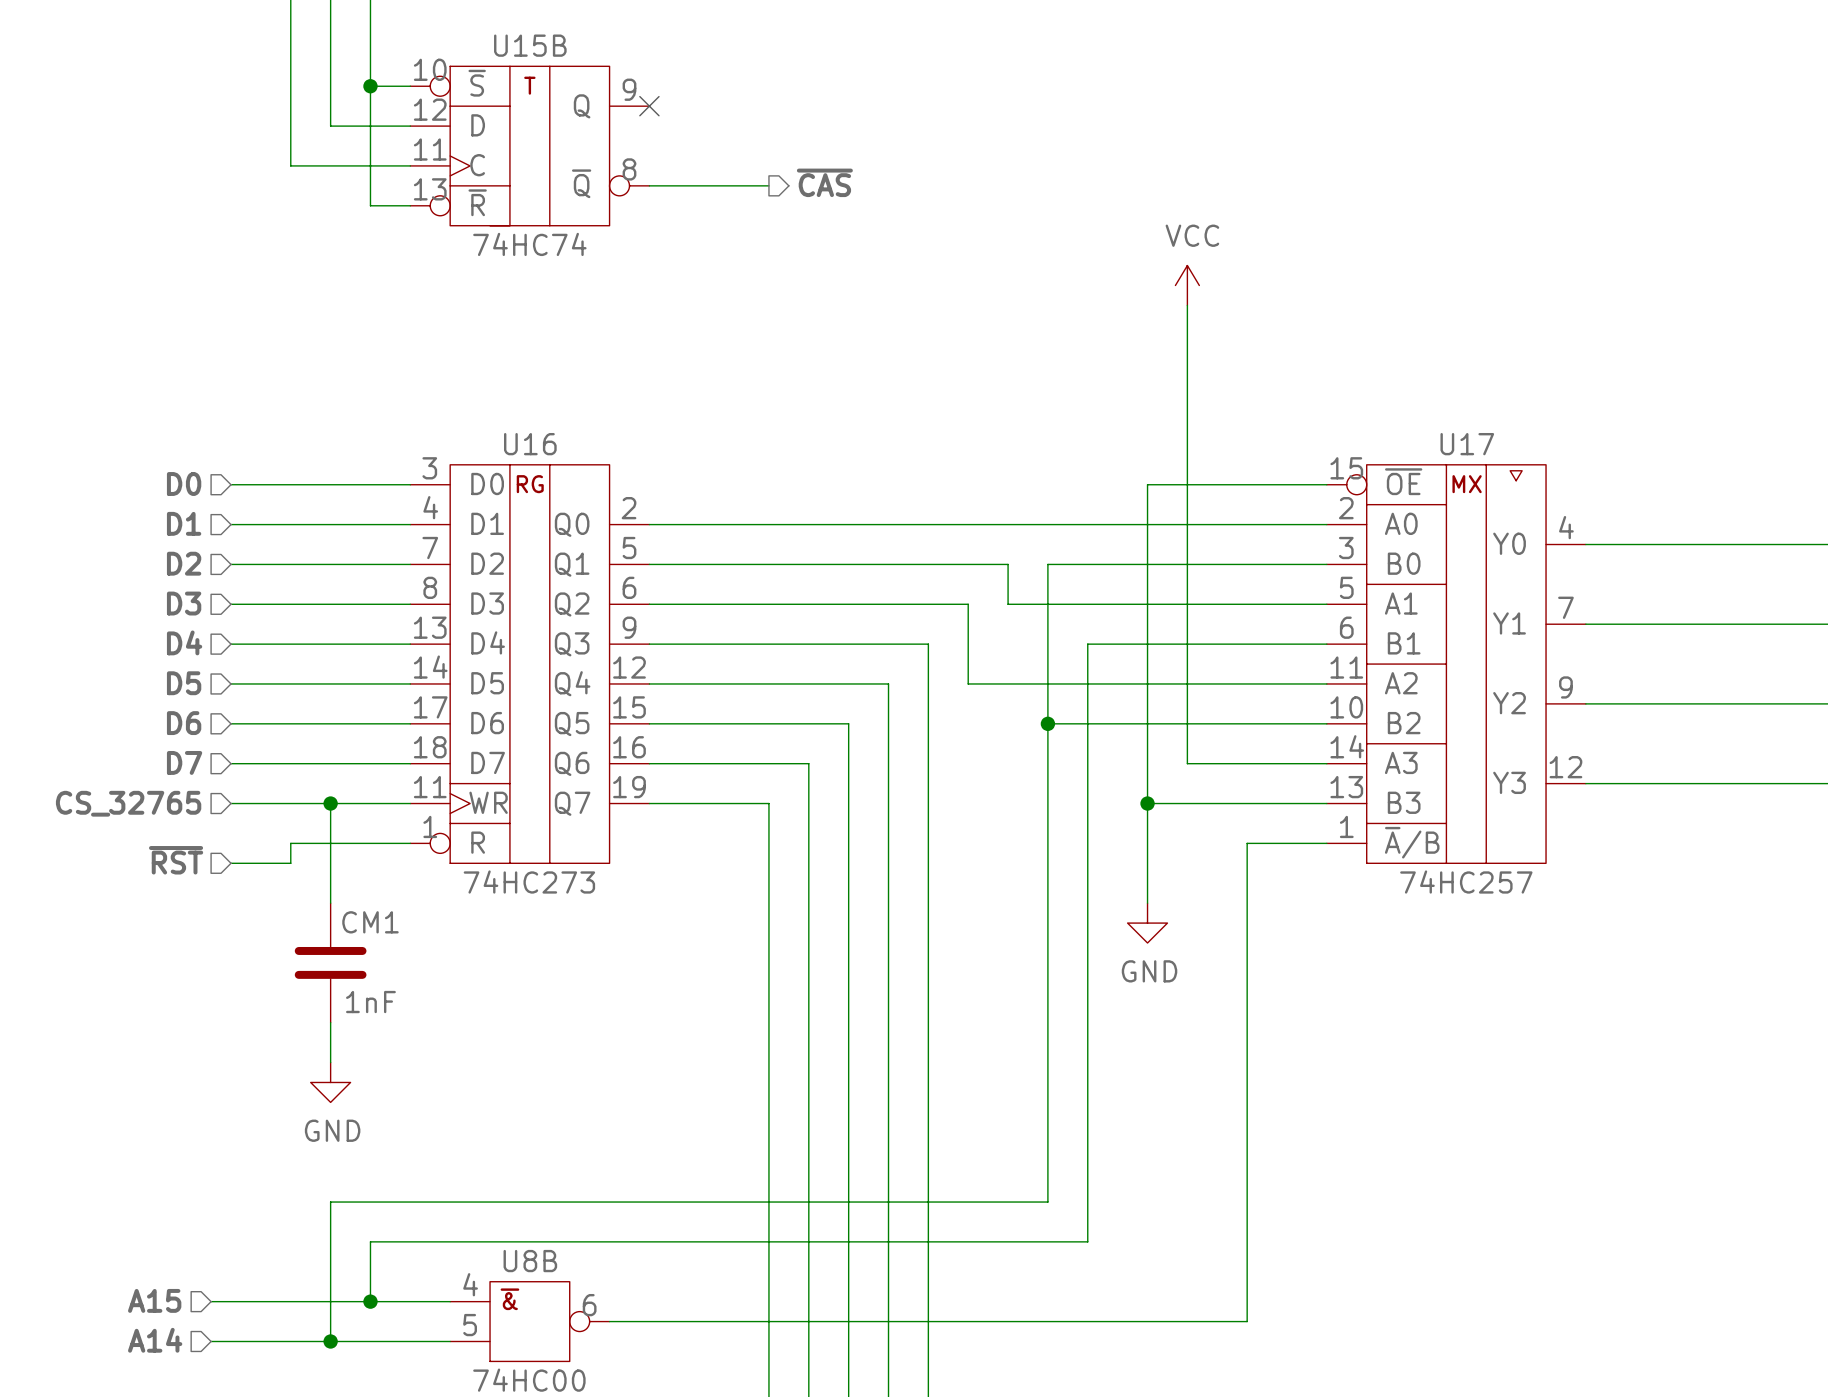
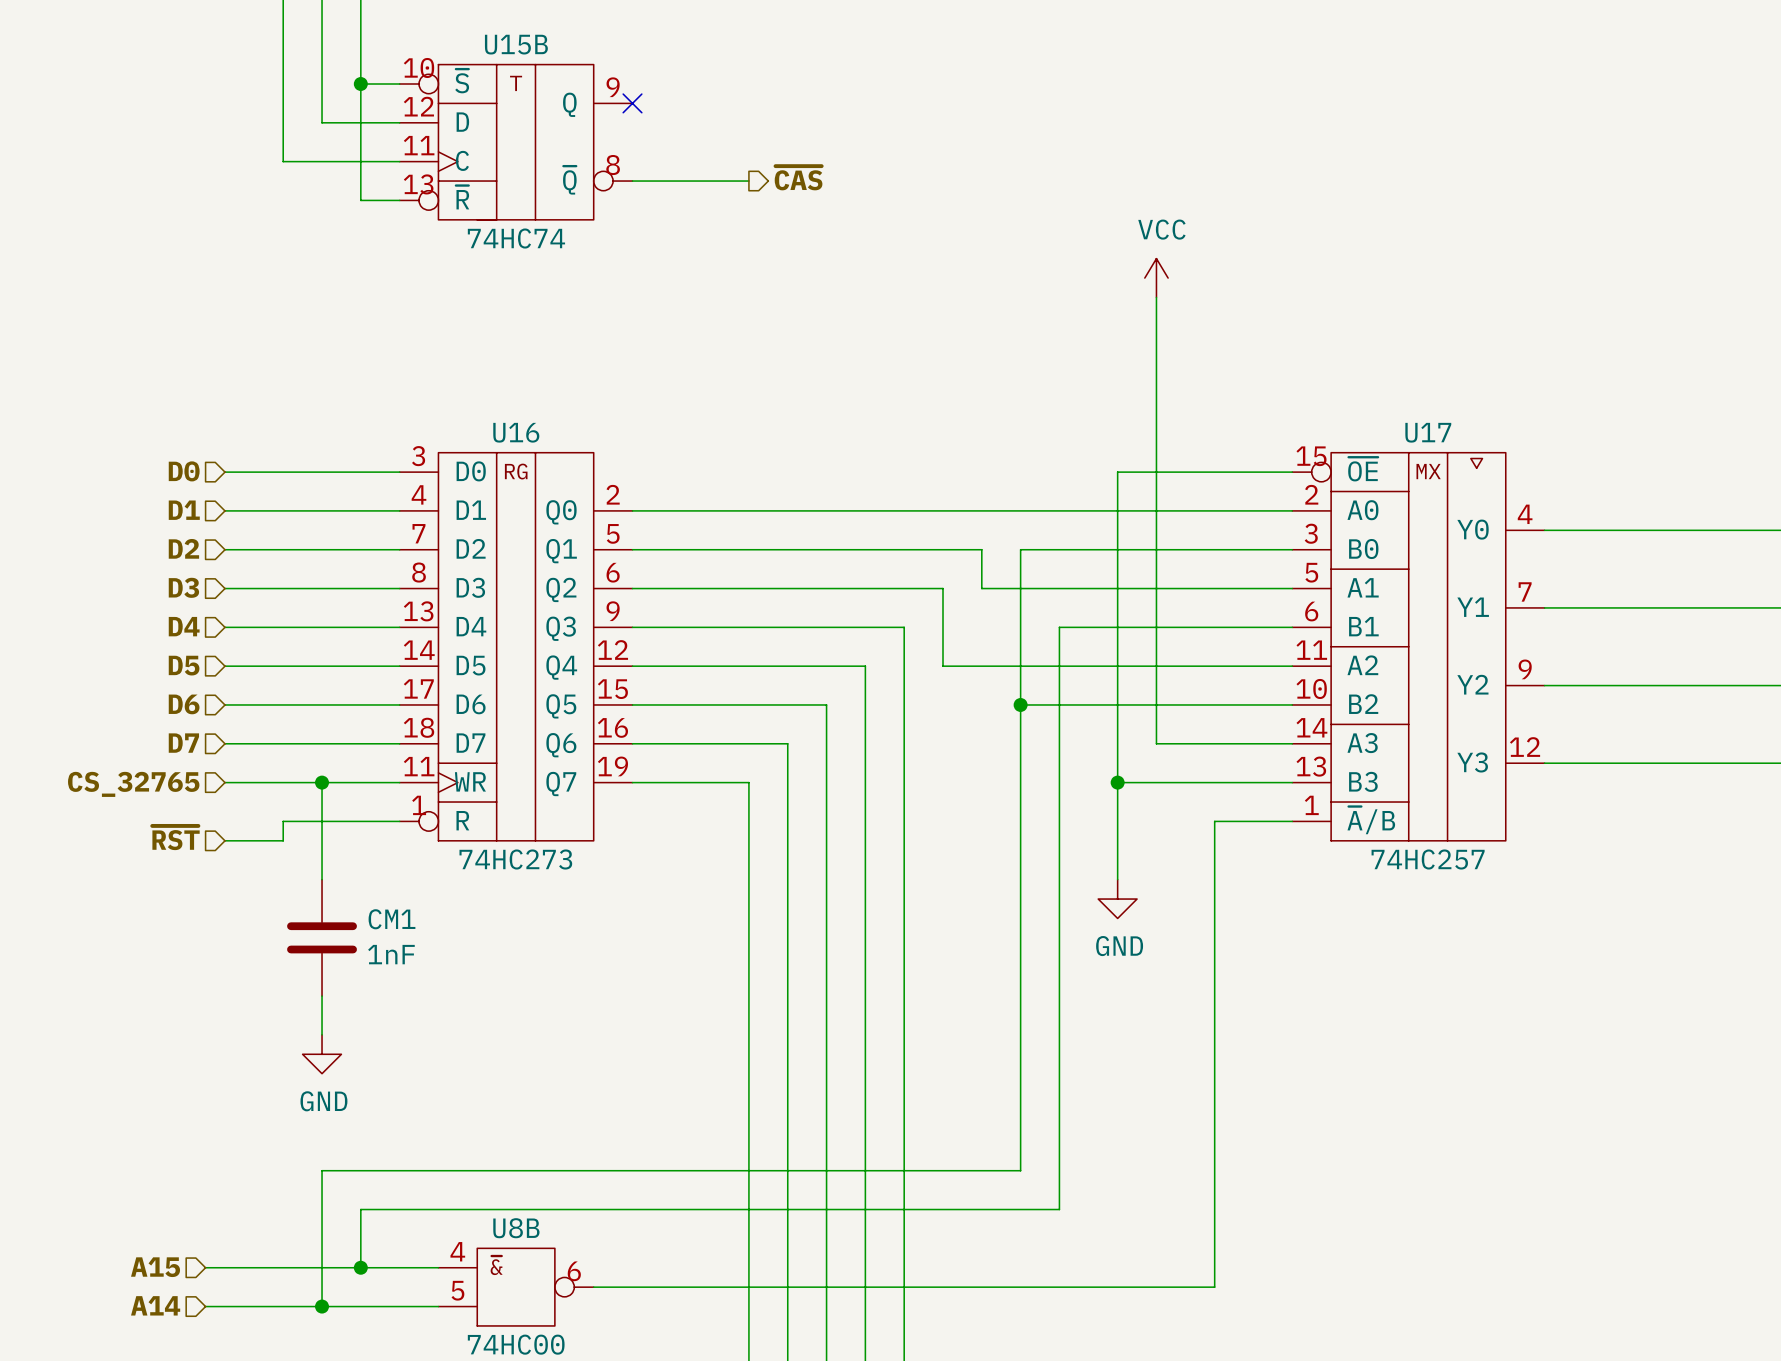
CM1 name position: CM1 (370, 922) -> CM1 (391, 919)
CM1 value position: 1nF (370, 1002) -> 1nF (391, 954)

